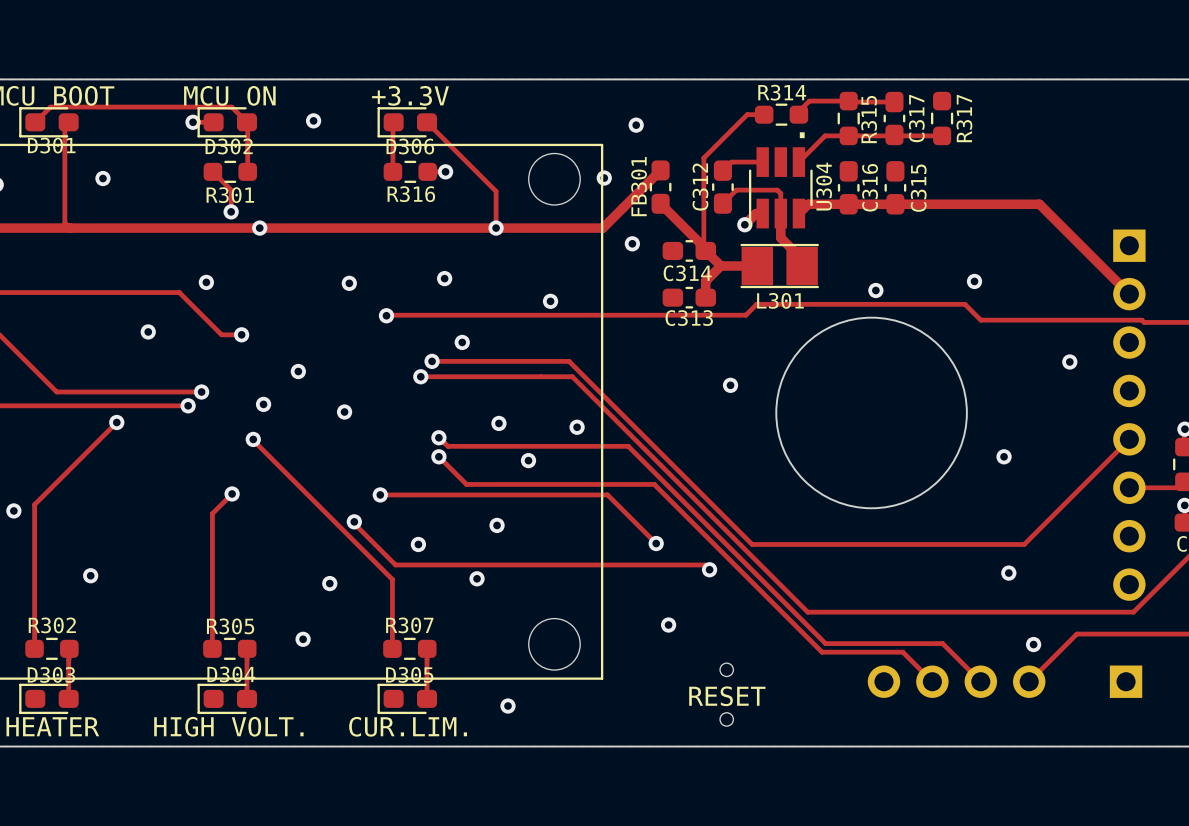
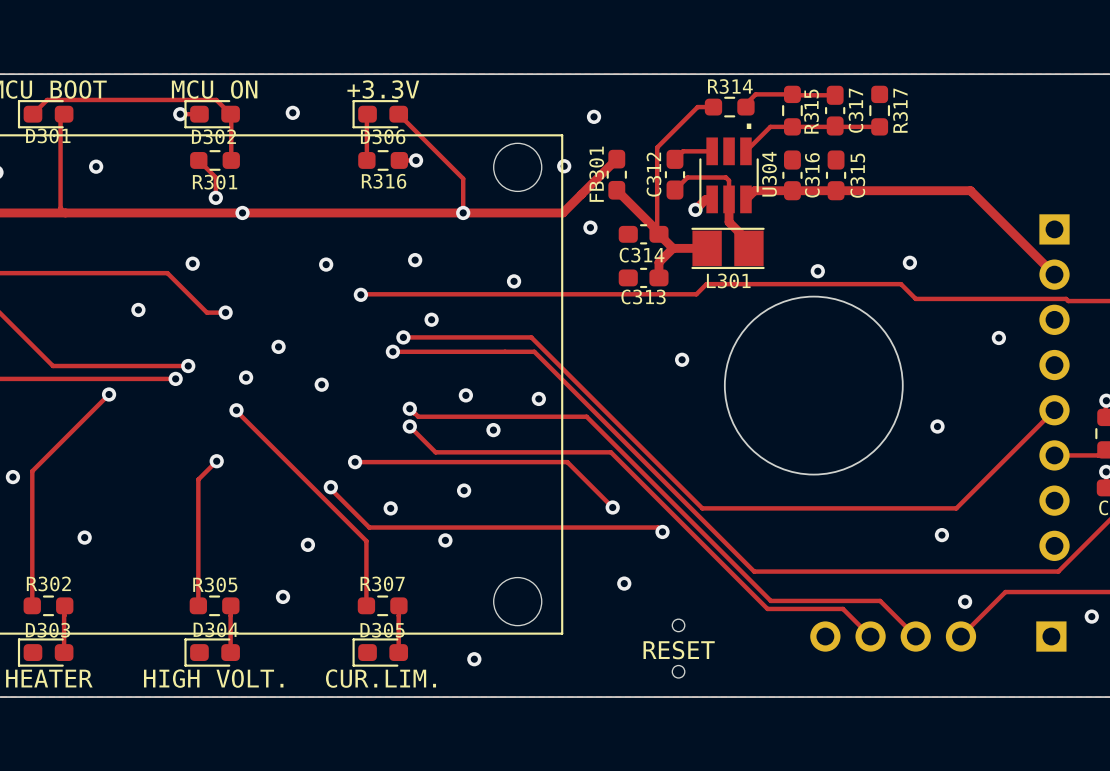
via: none -> (1091, 616)

